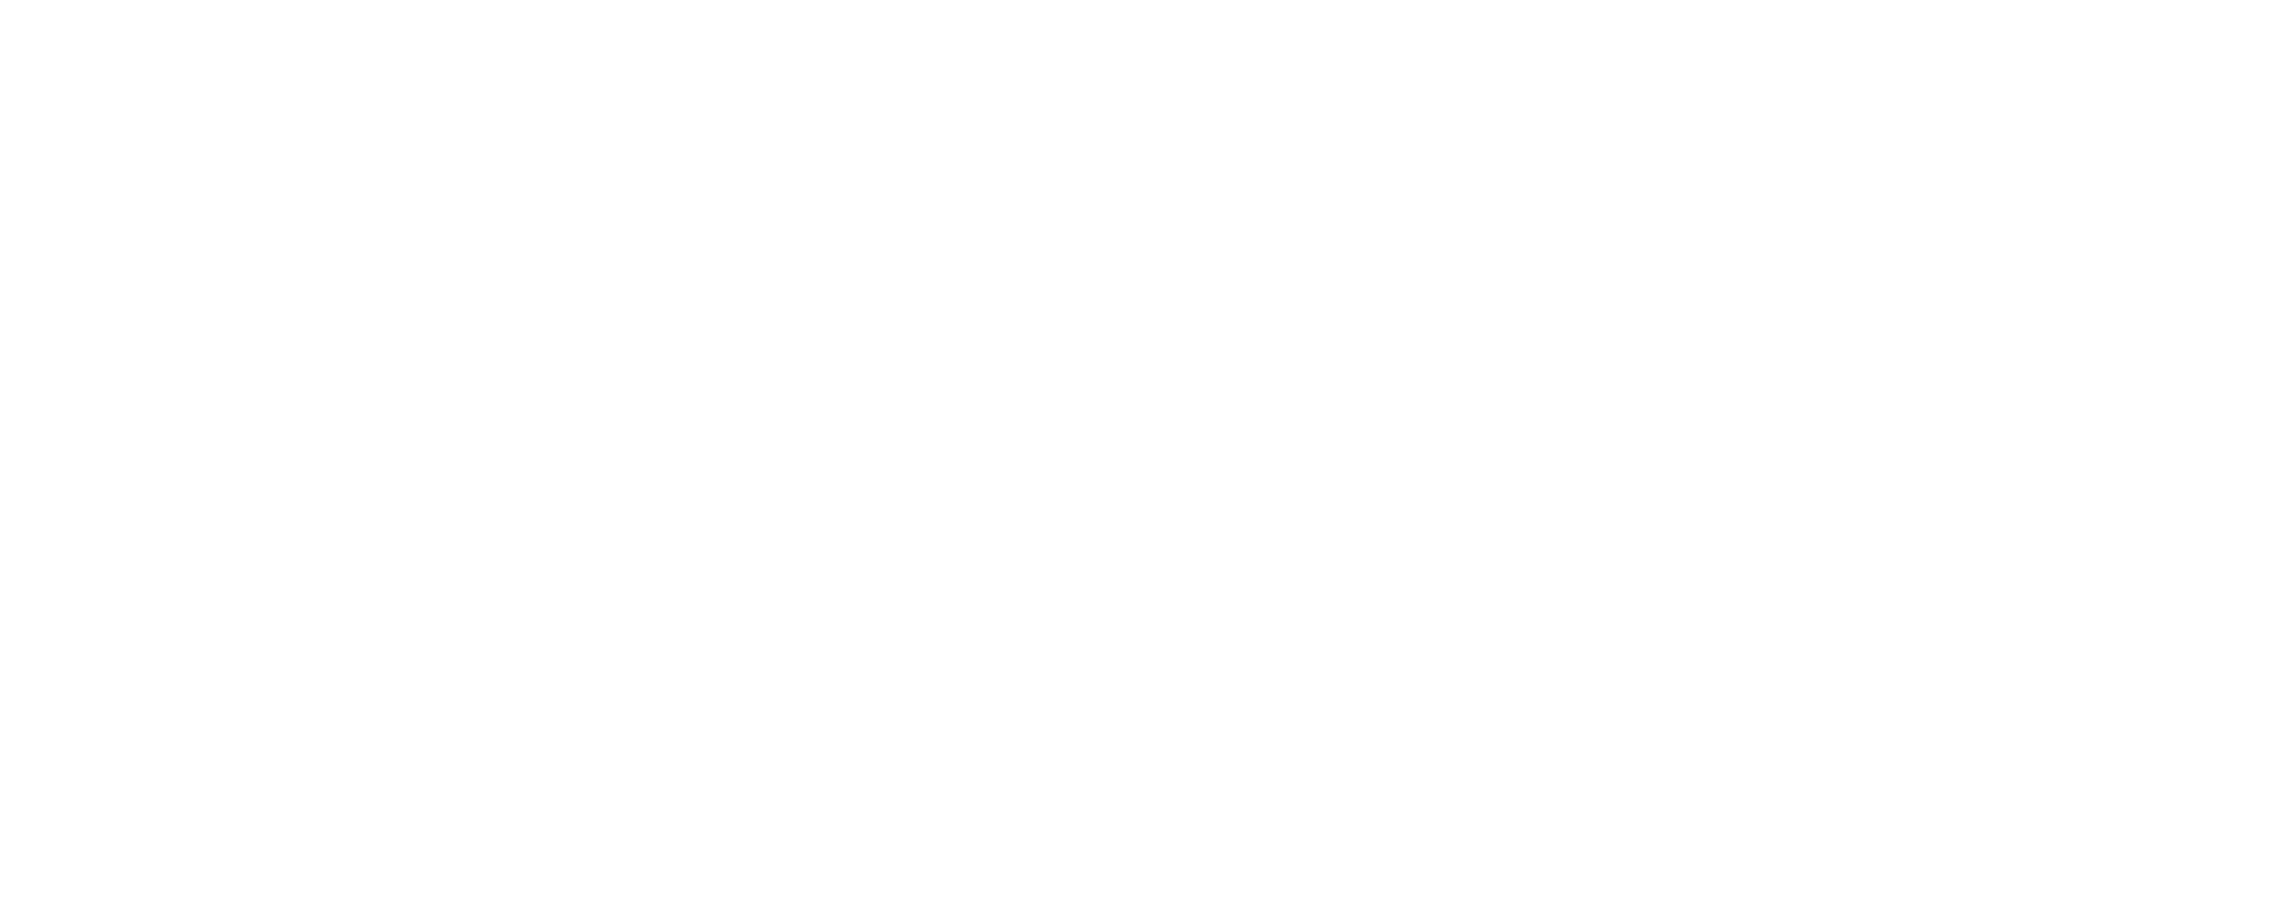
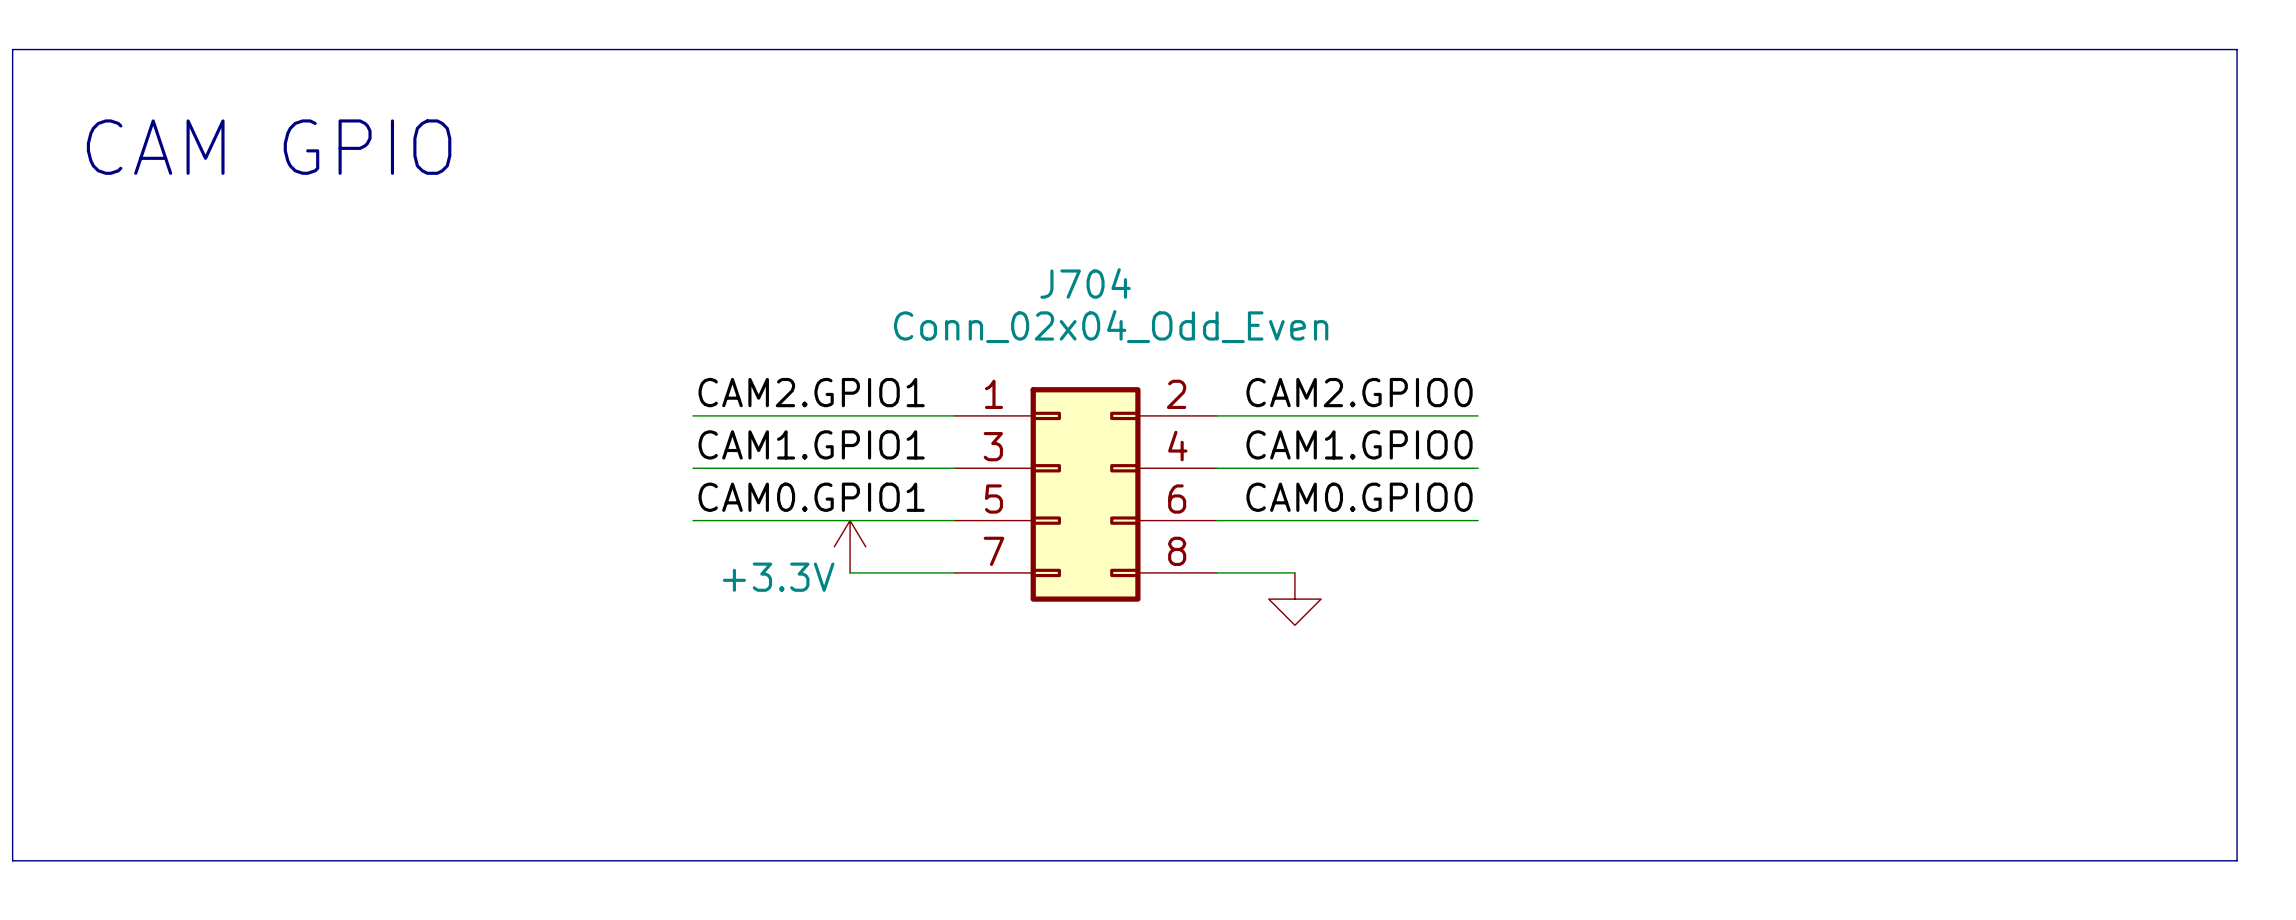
line: none -> (12, 49) (2237, 49) (2237, 860) (12, 860) (12, 49)
text: none -> CAM GPIO (269, 147)
label: none -> CAM2.GPIO1 (811, 392)
label: none -> CAM2.GPIO0 (1359, 392)
wire: none -> (693, 415) (954, 415)
wire: none -> (1216, 415) (1478, 415)
label: none -> CAM1.GPIO1 (811, 444)
label: none -> CAM1.GPIO0 (1359, 444)
wire: none -> (693, 468) (954, 468)
wire: none -> (1216, 468) (1478, 468)
J704: none -> Conn_02x04_Odd_Even (1085, 494)
label: none -> CAM0.GPIO1 (811, 497)
label: none -> CAM0.GPIO0 (1359, 497)
wire: none -> (693, 520) (954, 520)
wire: none -> (1216, 520) (1478, 520)
power symbol: none -> +3.3V (850, 546)
wire: none -> (850, 572) (954, 572)
wire: none -> (1216, 572) (1294, 572)
power symbol: none -> (1294, 599)

